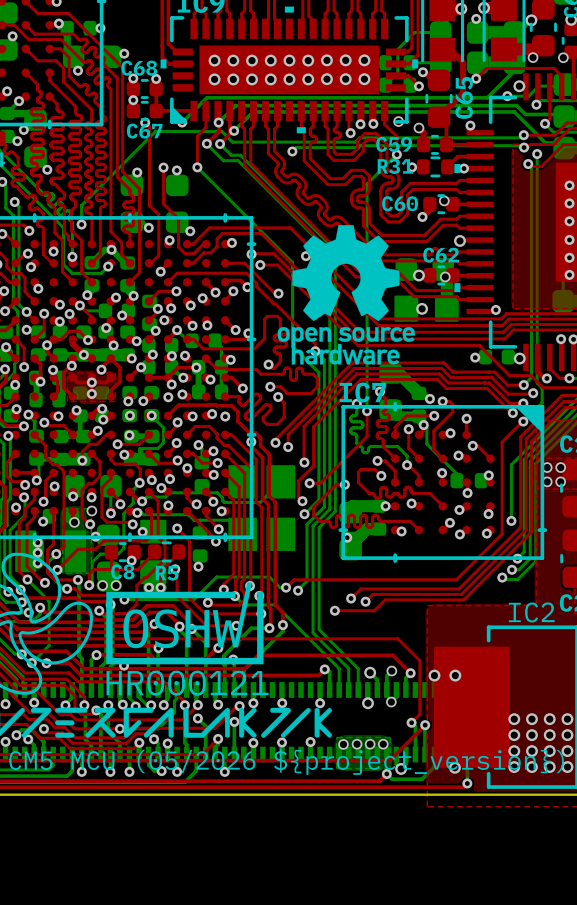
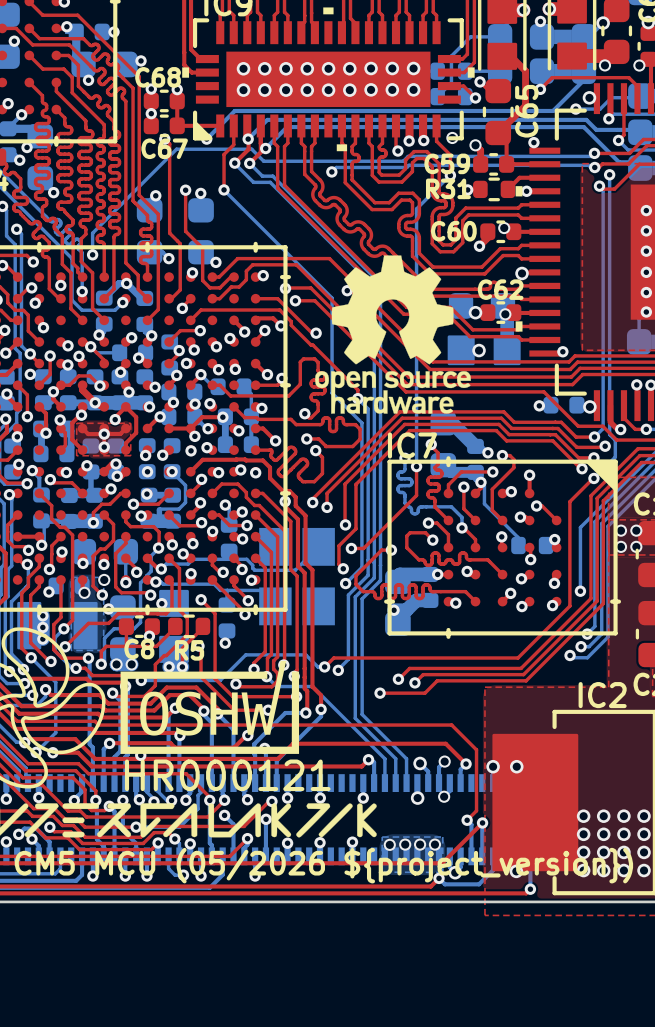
via: (16, 507) -> none

